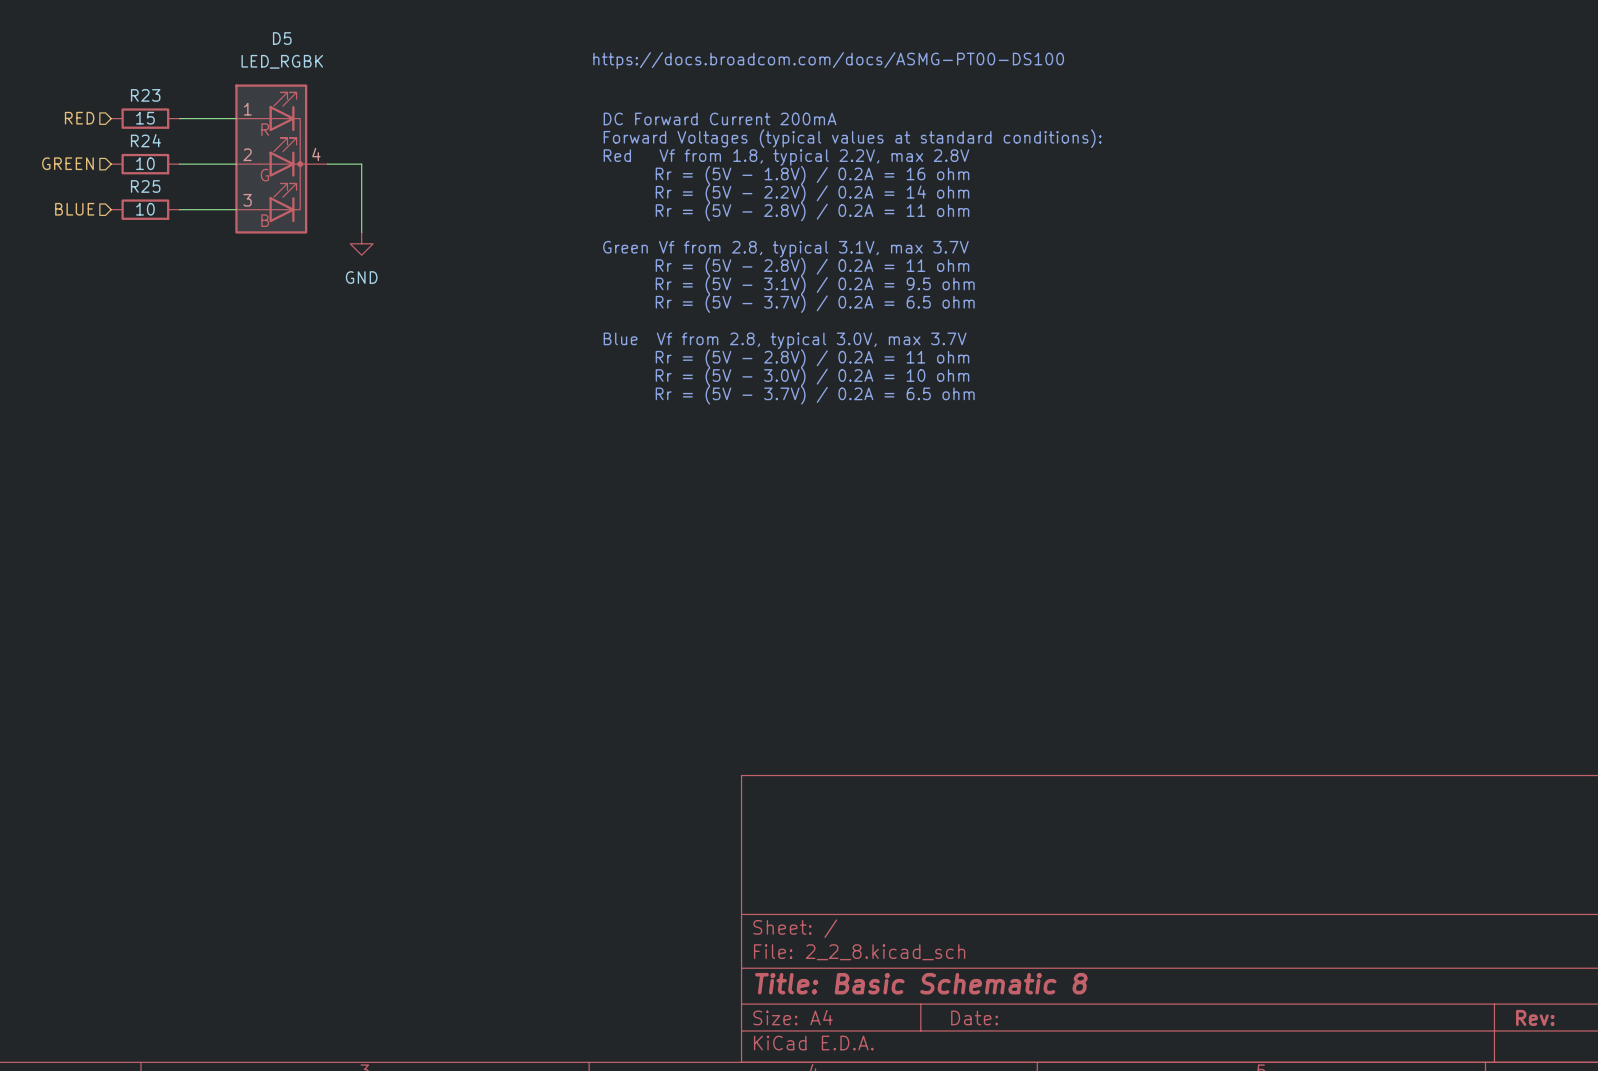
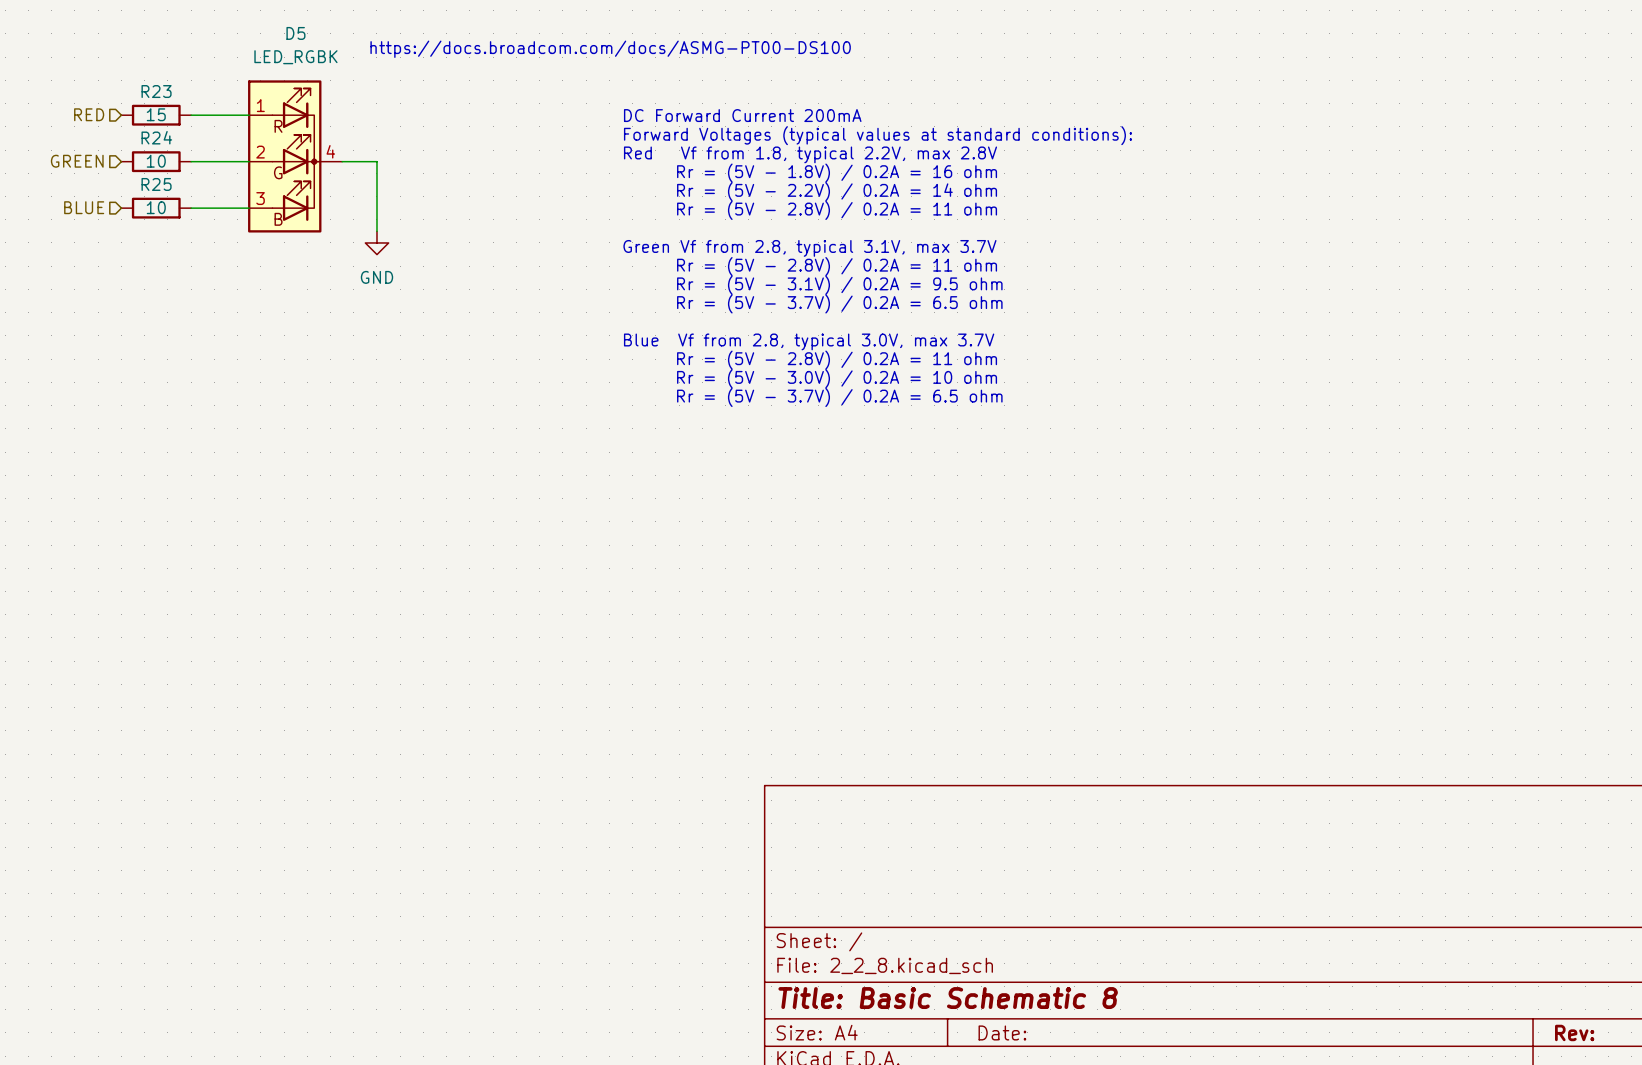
text position: https://docs.broadcom.com/docs/ASMG-PT00-DS100 (828, 60) -> https://docs.broadcom.com/docs/ASMG-PT00-DS100 (610, 49)

